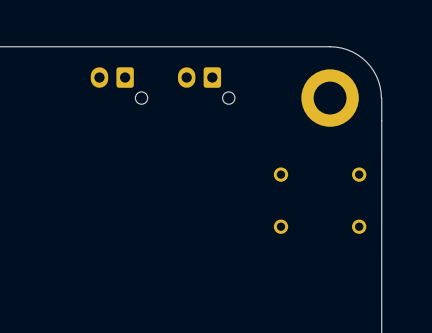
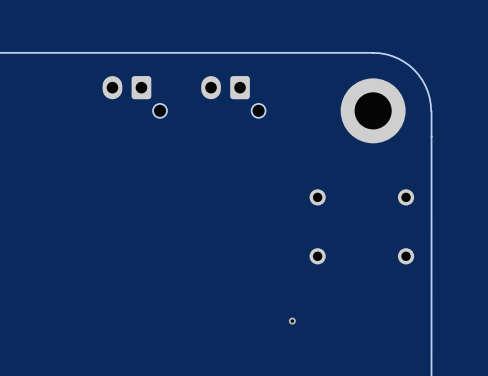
via: none -> (292, 321)

